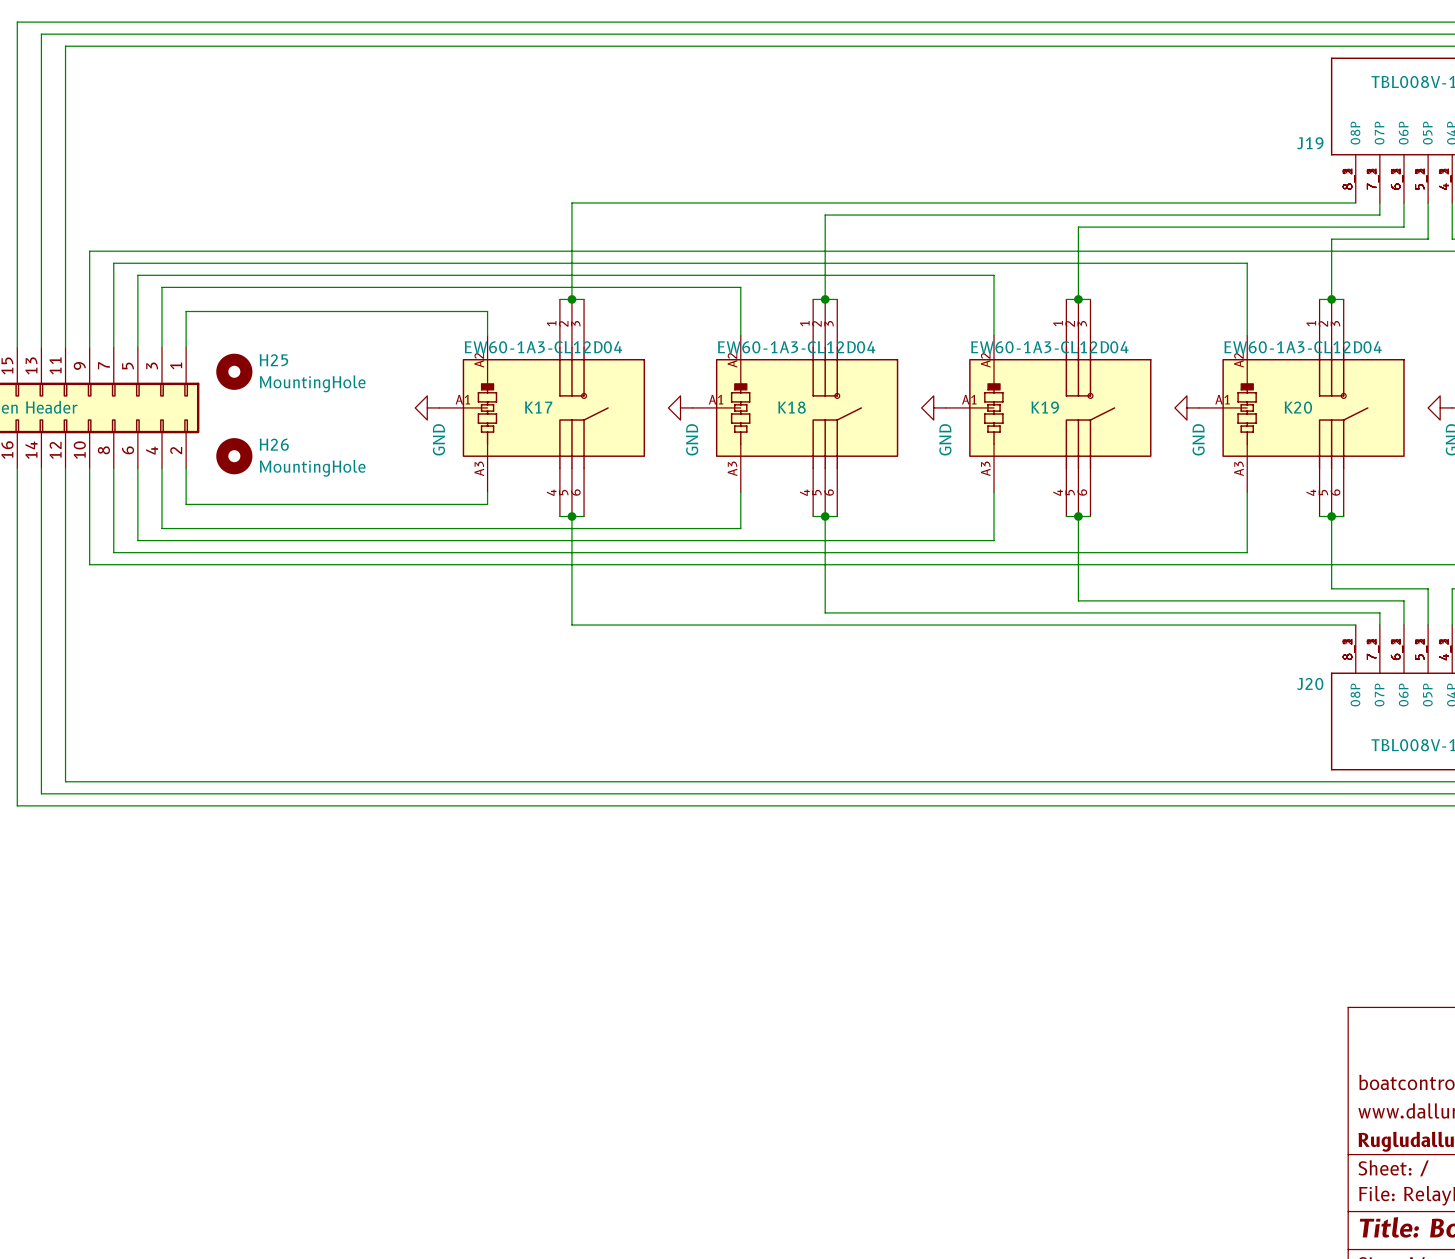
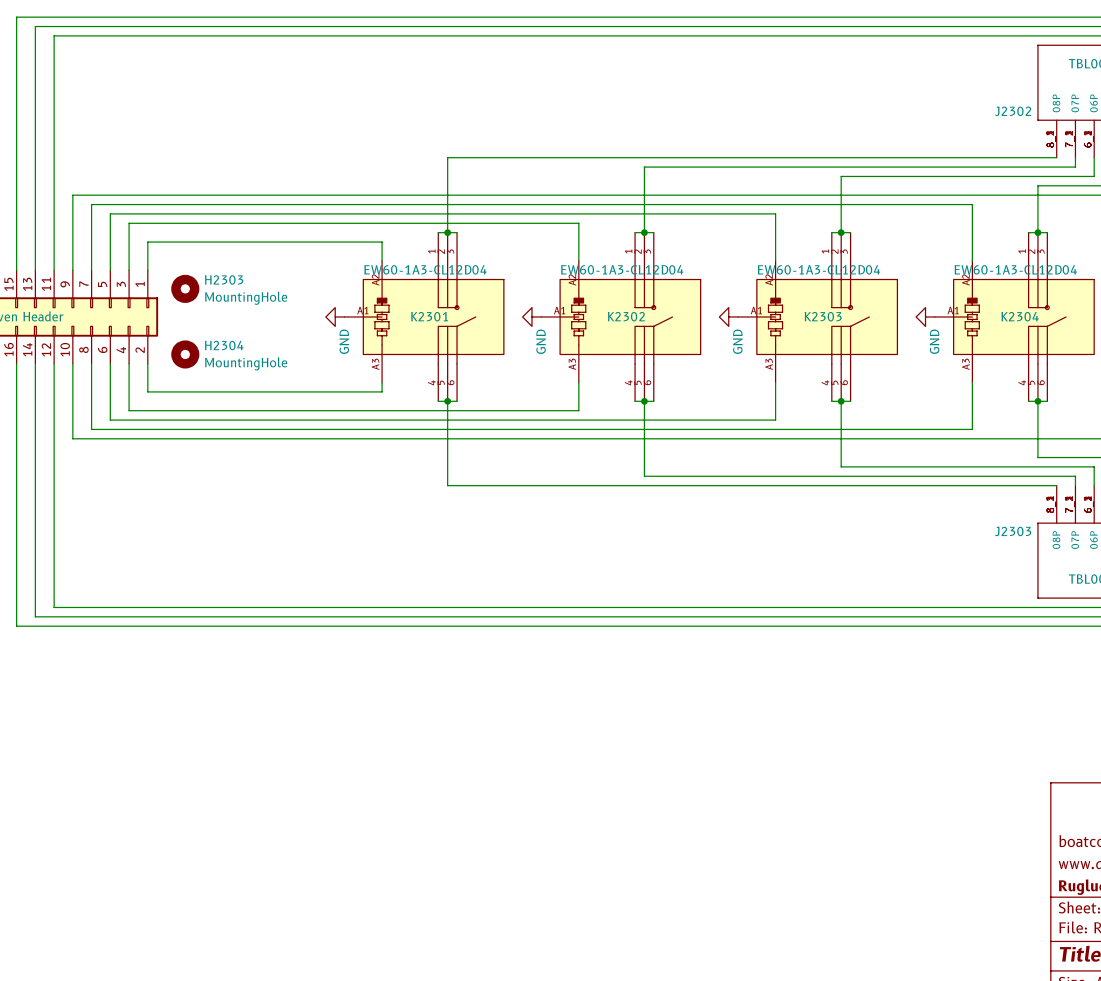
J19 name: J19 (1310, 143) -> J2302 (1013, 111)
H25 name: H25 (273, 360) -> H2303 (224, 279)
K17 name: K17 (538, 407) -> K2301 (429, 316)
K18 name: K18 (792, 407) -> K2302 (626, 316)
K19 name: K19 (1045, 407) -> K2303 (823, 316)
K20 name: K20 (1298, 407) -> K2304 (1020, 316)
H26 name: H26 (274, 444) -> H2304 (224, 345)
J20 name: J20 (1310, 683) -> J2303 (1013, 531)

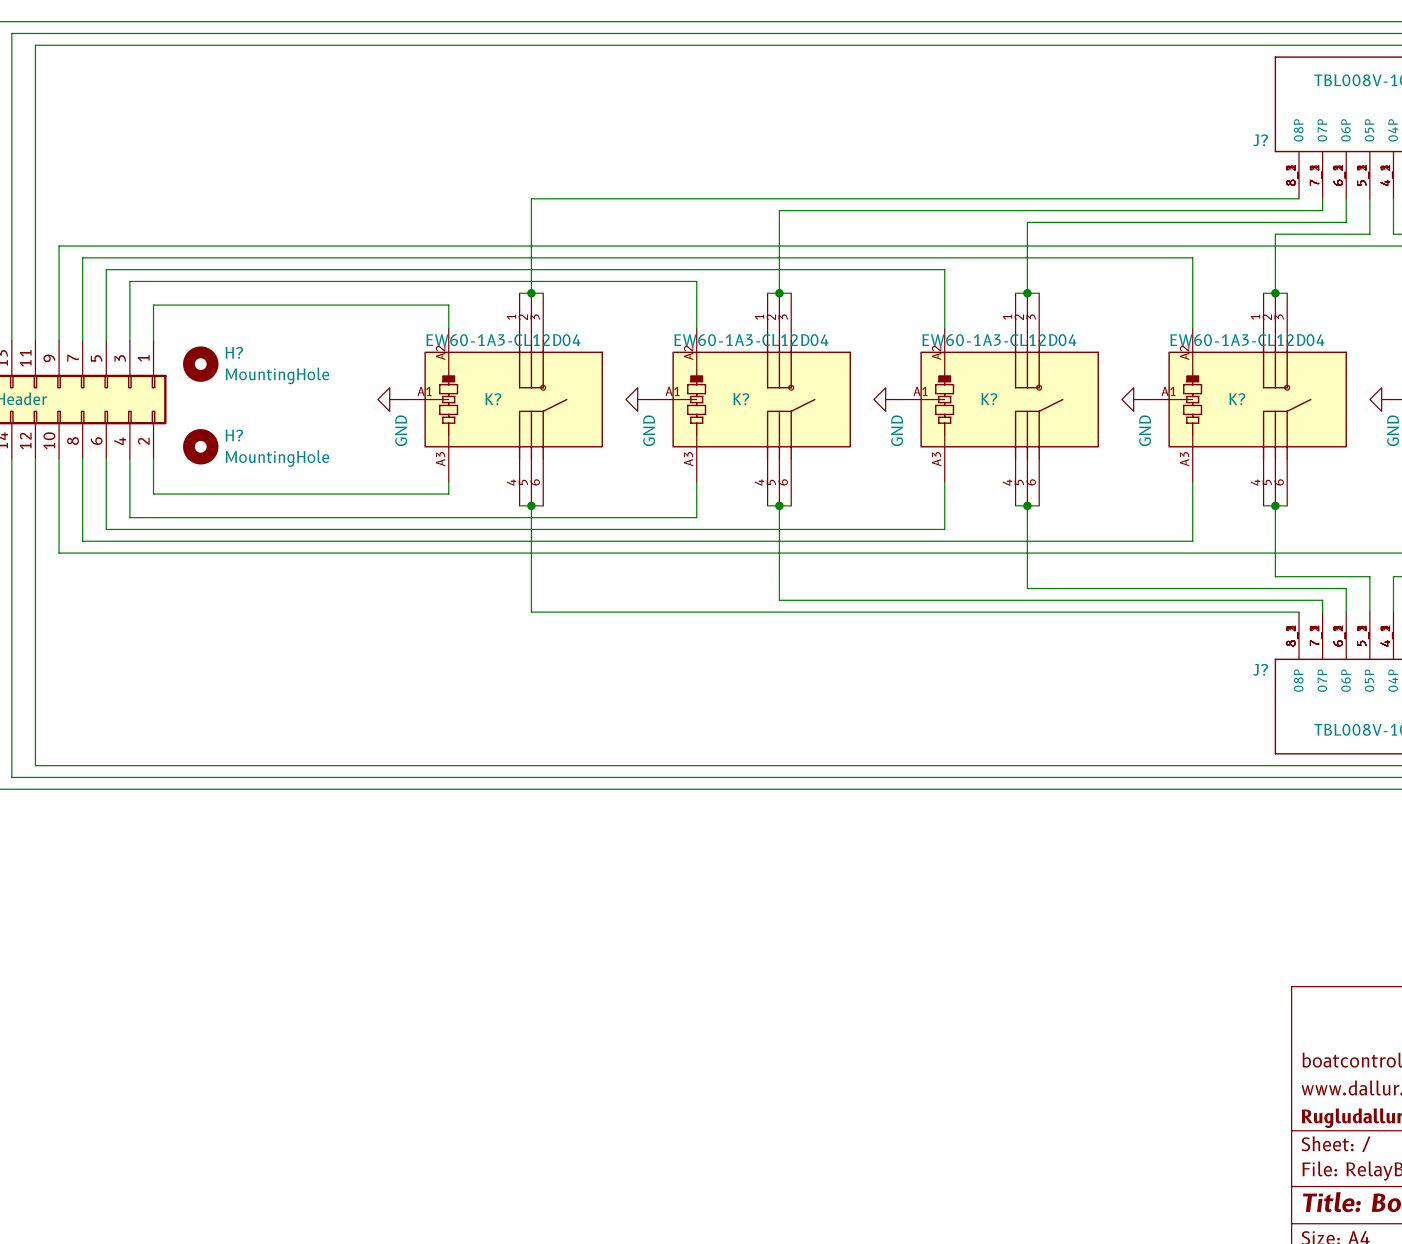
J2302 name: J2302 (1013, 111) -> J? (1260, 140)
H2303 name: H2303 (224, 279) -> H? (234, 352)
K2301 name: K2301 (429, 316) -> K? (493, 399)
K2302 name: K2302 (626, 316) -> K? (741, 399)
K2303 name: K2303 (823, 316) -> K? (989, 399)
K2304 name: K2304 (1020, 316) -> K? (1237, 399)
H2304 name: H2304 (224, 345) -> H? (234, 435)
J2303 name: J2303 (1013, 531) -> J? (1260, 669)

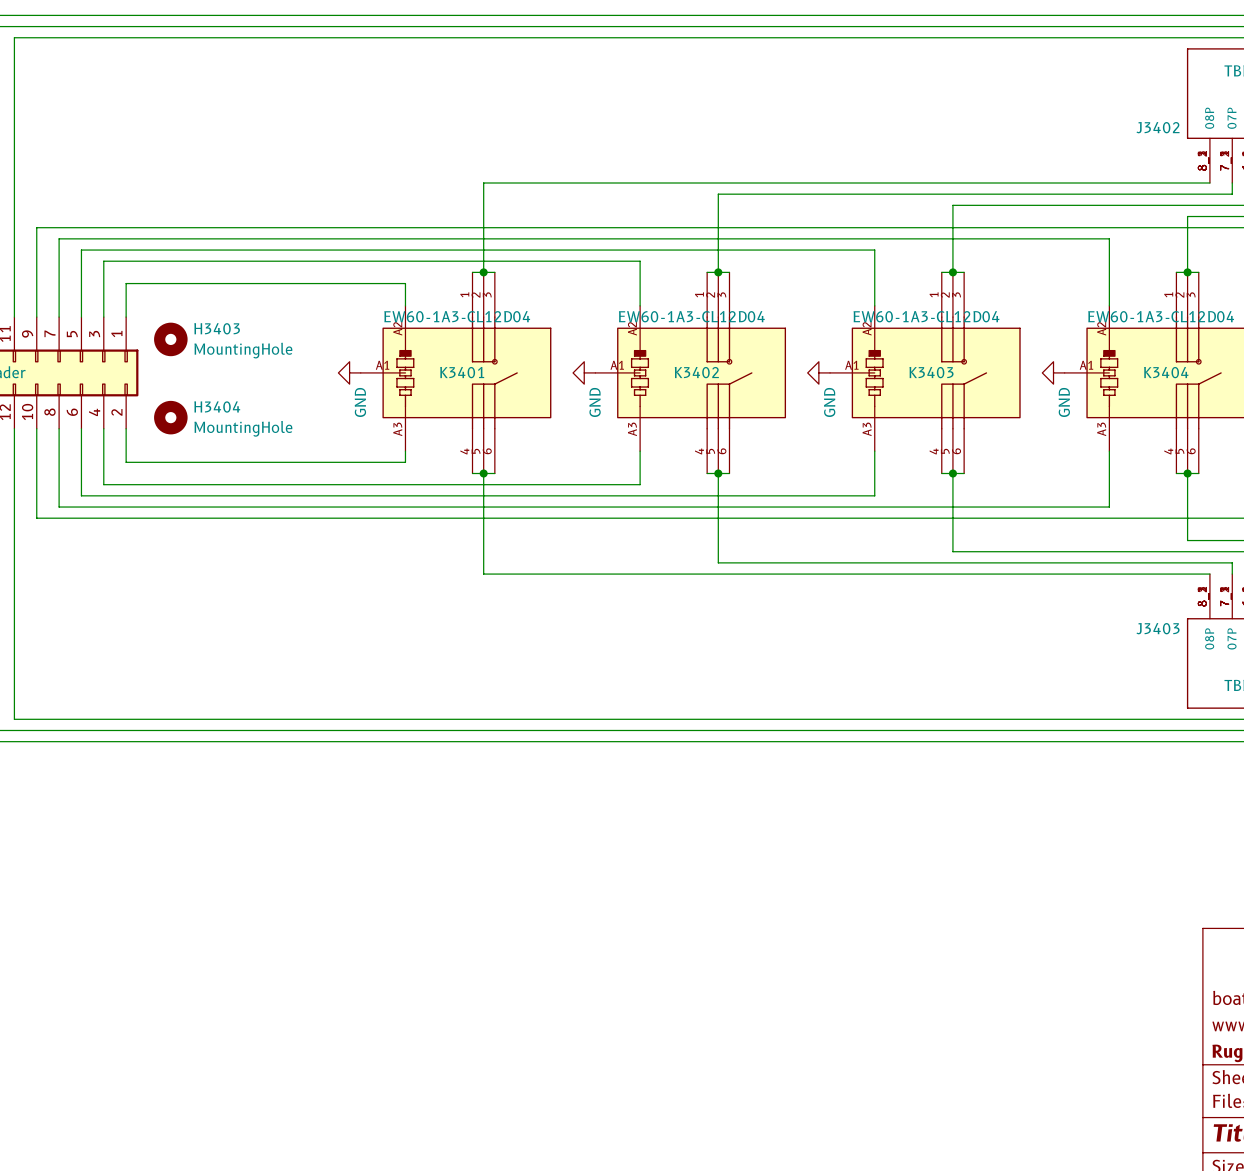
J? name: J? (1260, 140) -> J3402 (1158, 127)
H? name: H? (234, 352) -> H3403 (217, 328)
K? name: K? (493, 399) -> K3401 (462, 372)
K? name: K? (741, 399) -> K3402 (696, 372)
K? name: K? (989, 399) -> K3403 (931, 372)
K? name: K? (1237, 399) -> K3404 (1166, 372)
H? name: H? (234, 435) -> H3404 (217, 407)
J? name: J? (1260, 669) -> J3403 (1158, 628)

